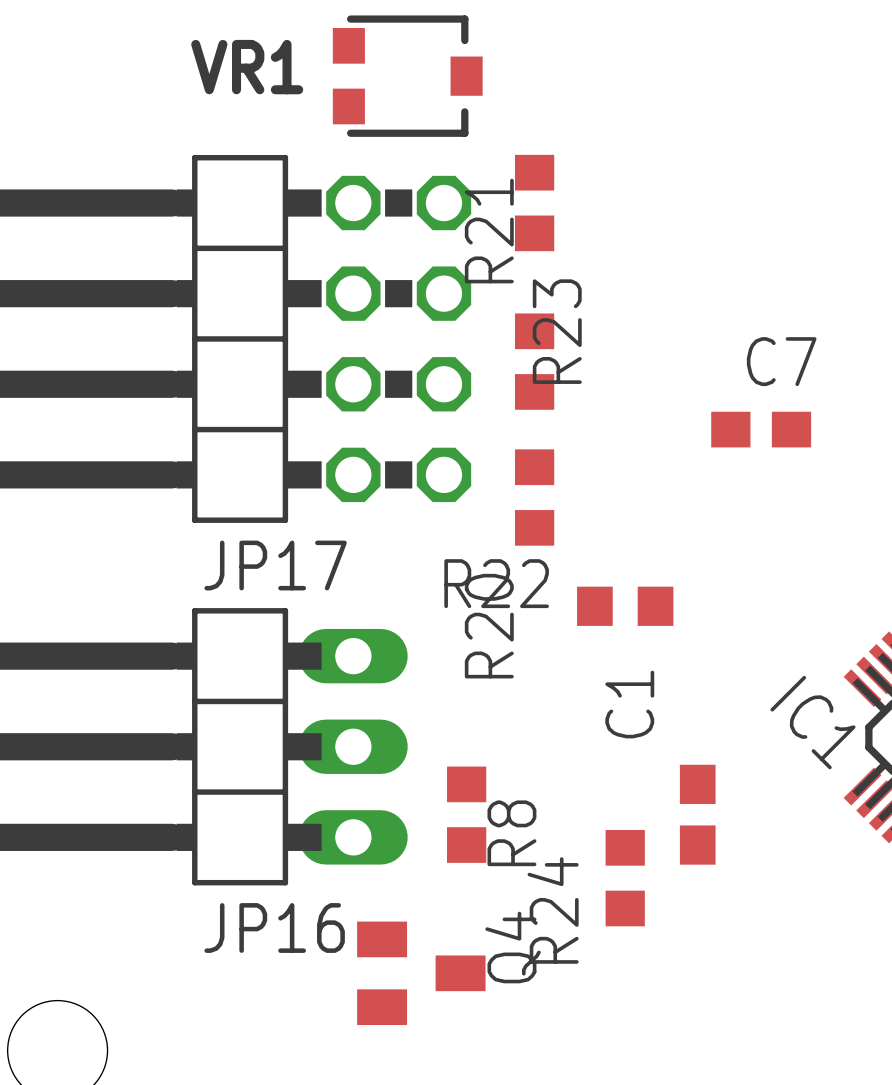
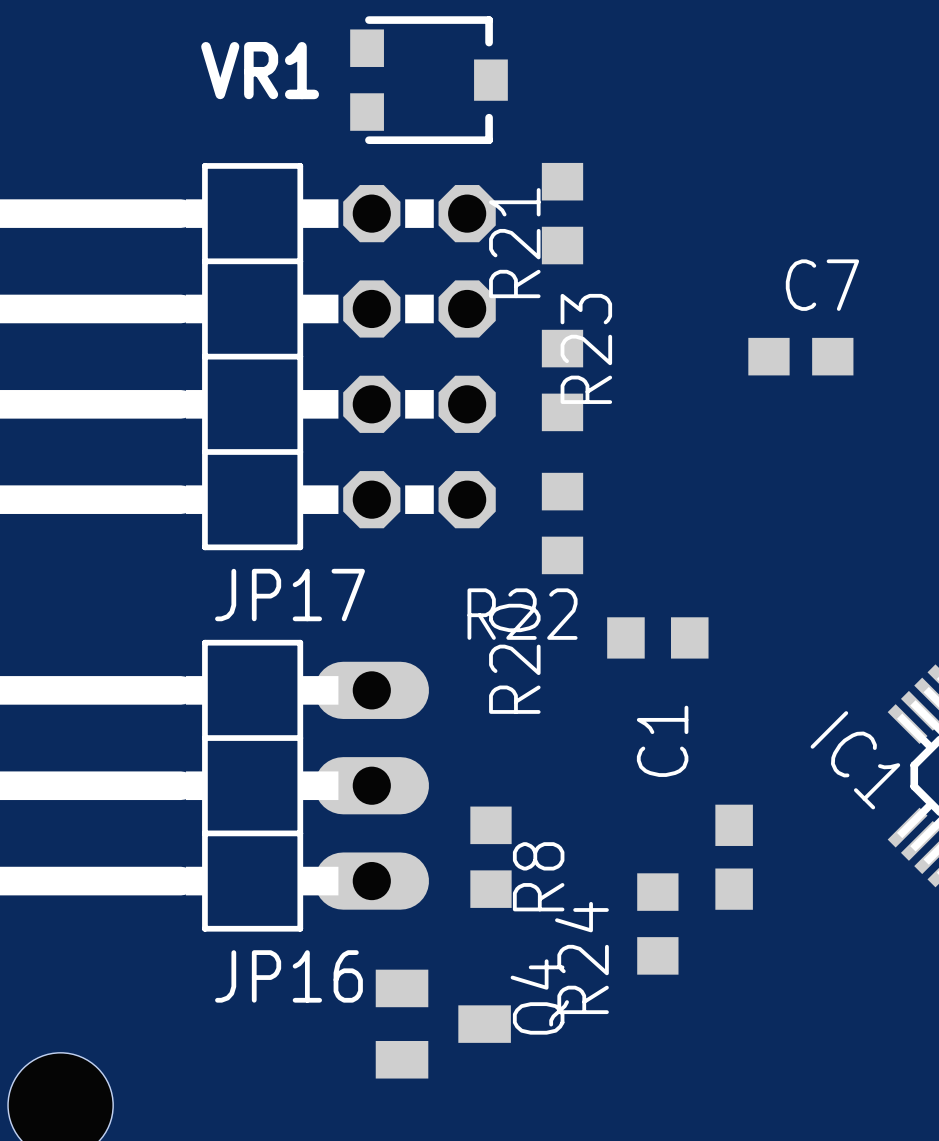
C7 position: (761, 429) -> (800, 356)

